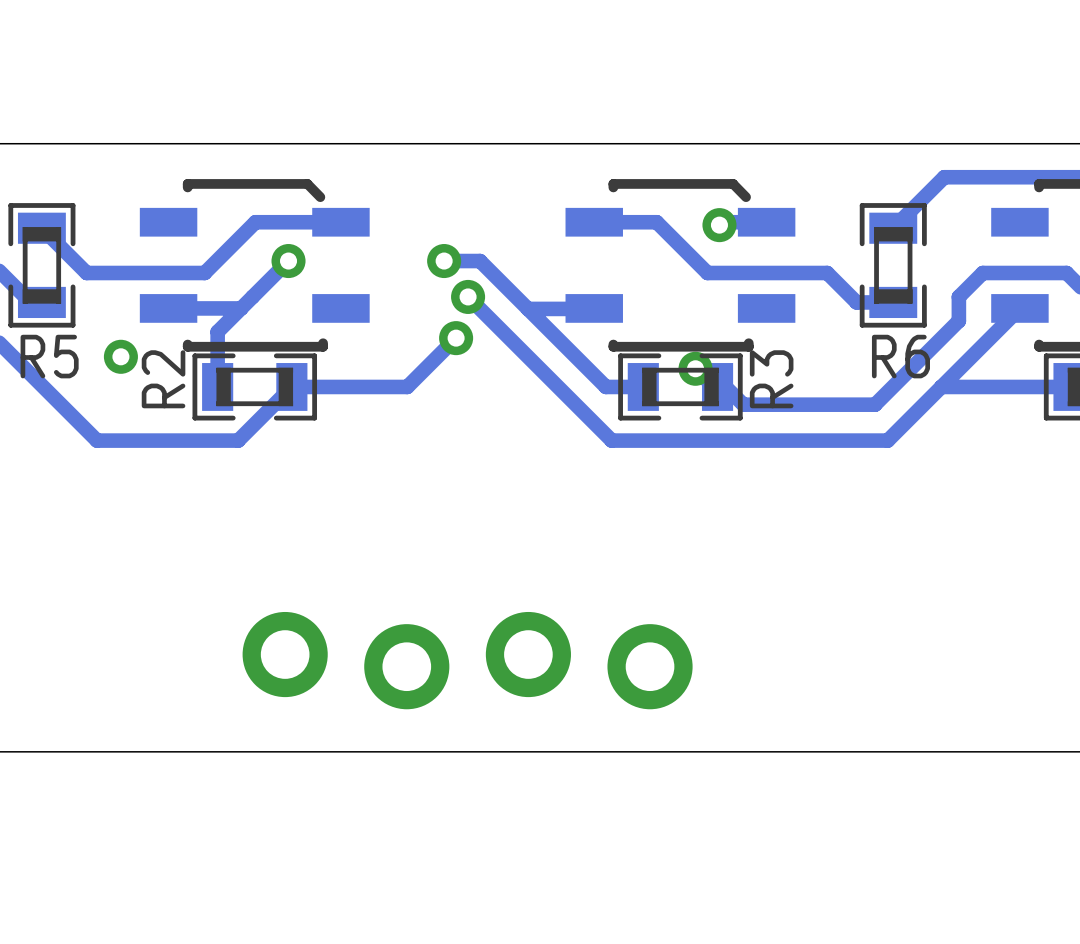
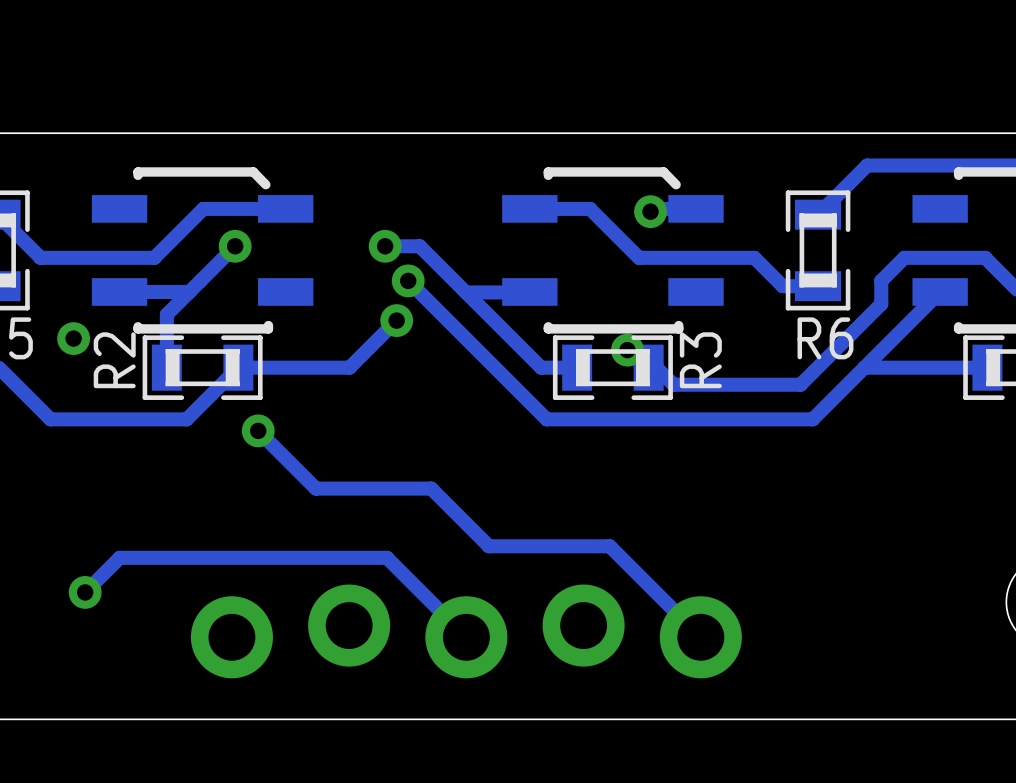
track: none -> (258, 430) (315, 488) (431, 488) (489, 546) (609, 546) (700, 637)
via: none -> (258, 430)
track: none -> (85, 592) (119, 557) (386, 557) (466, 637)
via: none -> (85, 592)
part: (467, 660) -> none
part: none -> (466, 631)

